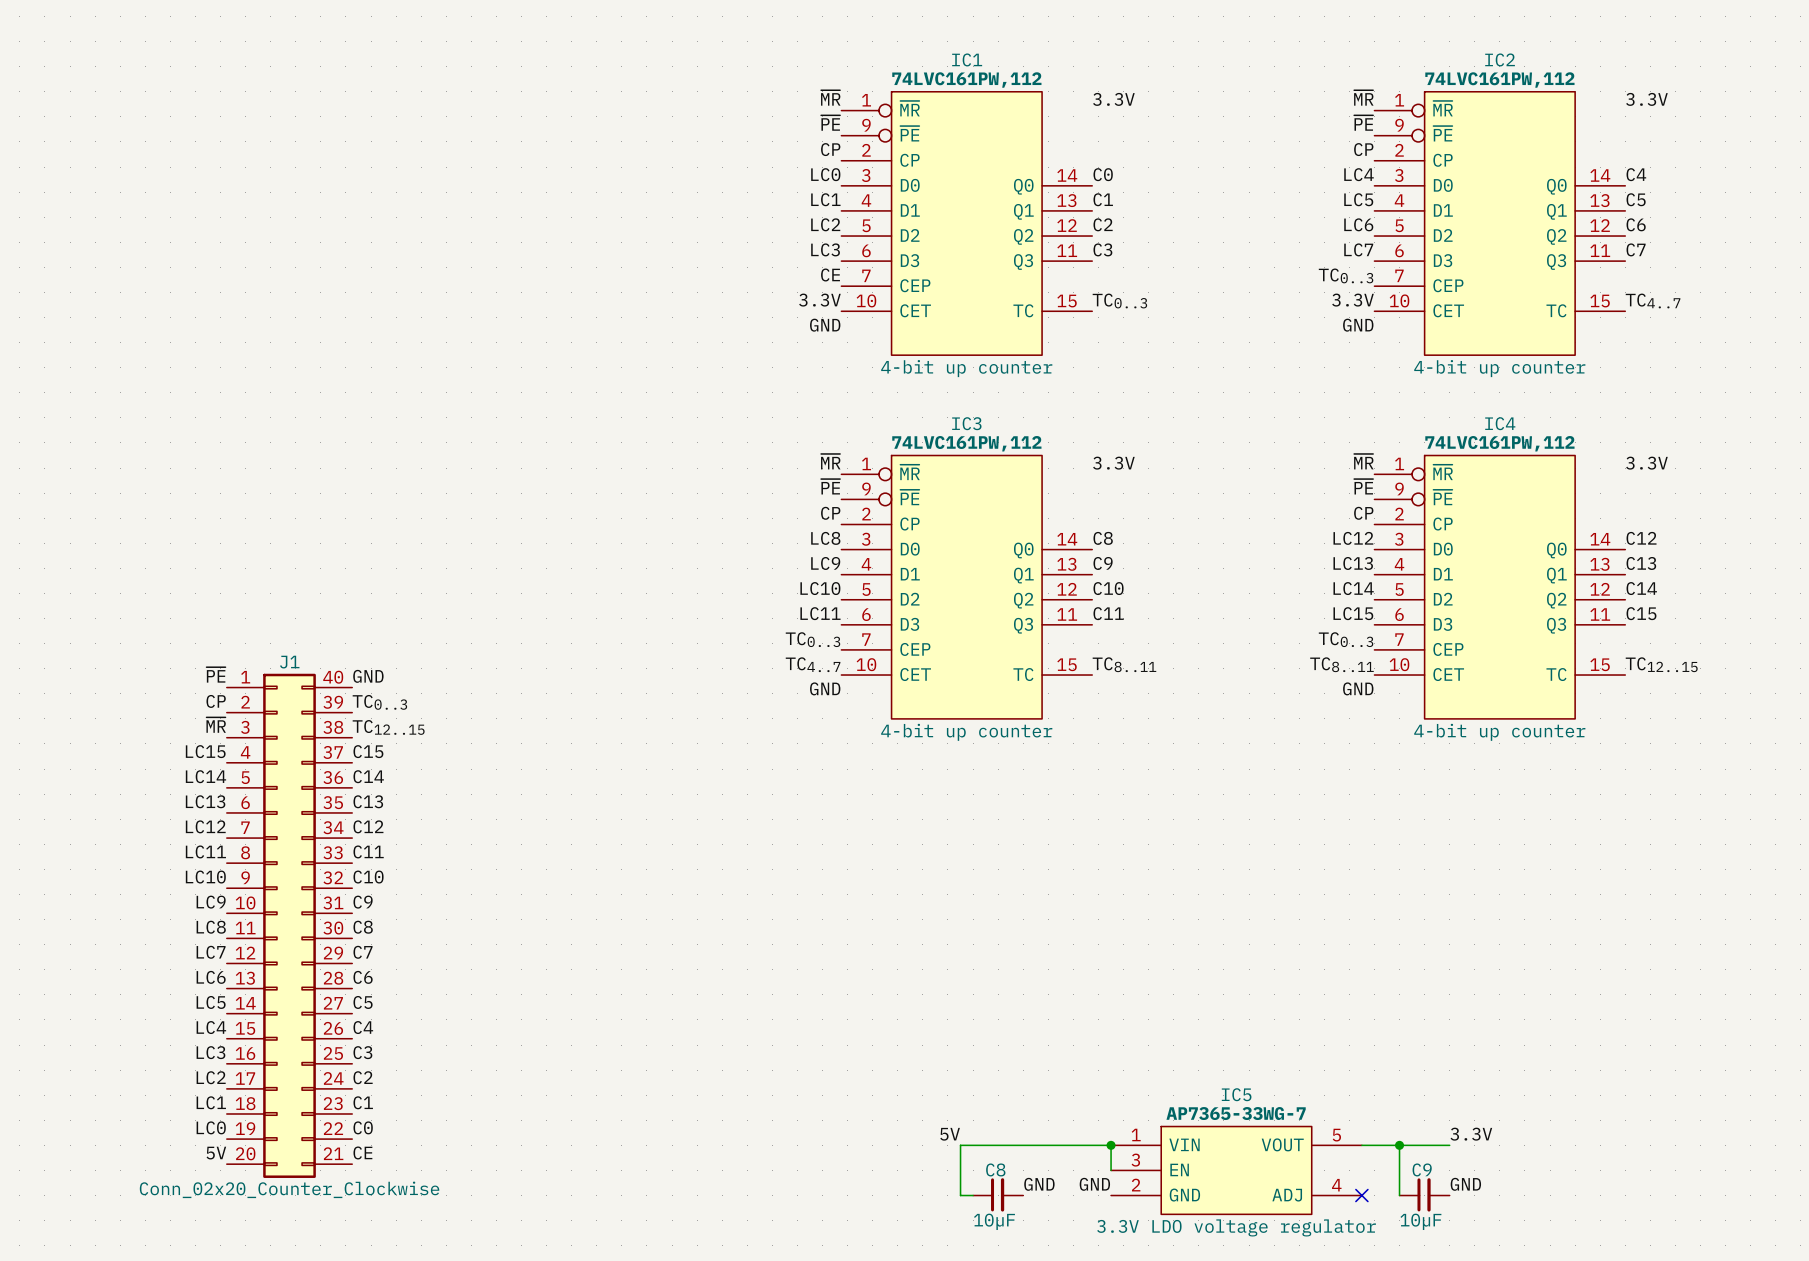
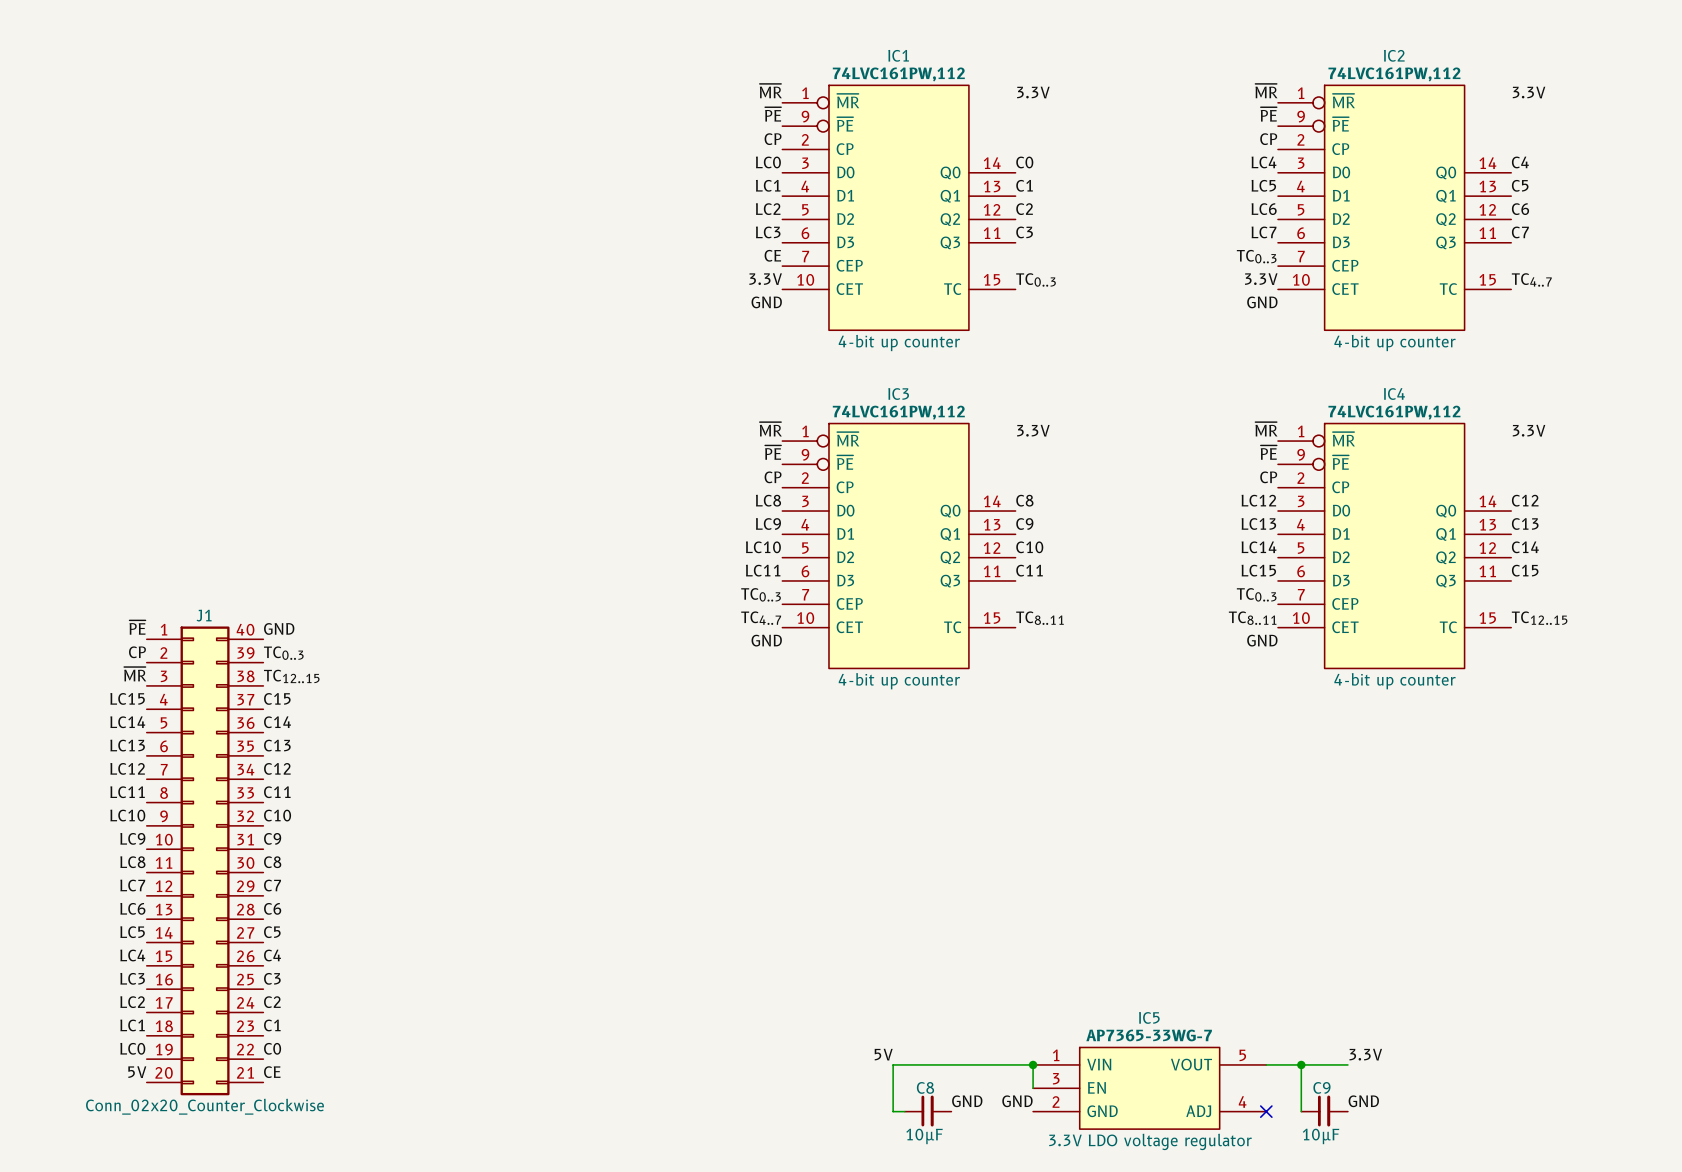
label position: ~{PE} (216, 674) -> ~{PE} (137, 627)
label position: GND (368, 676) -> GND (279, 628)
label position: CP (216, 701) -> CP (137, 652)
label position: TC0..3 (379, 702) -> TC0..3 (283, 653)
label position: ~{MR} (216, 725) -> ~{MR} (135, 674)
label position: TC12..15 (388, 727) -> TC12..15 (291, 676)
label position: LC15 (205, 751) -> LC15 (127, 698)
label position: C15 (368, 751) -> C15 (277, 698)
label position: LC14 (205, 776) -> LC14 (127, 722)
label position: C14 (368, 776) -> C14 (277, 722)
label position: LC13 (205, 801) -> LC13 (127, 745)
label position: C13 (368, 801) -> C13 (277, 745)
label position: LC12 (205, 826) -> LC12 (127, 768)
label position: C12 (368, 826) -> C12 (277, 768)
label position: LC11 (205, 851) -> LC11 (127, 792)
label position: C11 (368, 851) -> C11 (277, 792)
label position: LC10 (205, 877) -> LC10 (127, 815)
label position: C10 (368, 877) -> C10 (277, 815)
label position: LC9 (211, 902) -> LC9 (132, 838)
label position: C9 (363, 902) -> C9 (272, 838)
J1 position: (289, 925) -> (205, 860)
label position: LC8 (211, 927) -> LC8 (132, 862)
label position: C8 (363, 927) -> C8 (272, 862)
label position: LC7 (211, 952) -> LC7 (132, 885)
label position: C7 (363, 952) -> C7 (272, 885)
label position: LC6 (211, 977) -> LC6 (132, 908)
label position: C6 (363, 977) -> C6 (272, 908)
label position: LC5 (211, 1002) -> LC5 (132, 932)
label position: C5 (363, 1002) -> C5 (272, 932)
label position: LC4 (211, 1027) -> LC4 (132, 955)
label position: C4 (363, 1027) -> C4 (272, 955)
label position: LC3 (210, 1052) -> LC3 (132, 978)
label position: C3 (362, 1052) -> C3 (272, 978)
label position: LC2 (211, 1077) -> LC2 (132, 1002)
label position: C2 (363, 1077) -> C2 (272, 1002)
label position: LC1 (211, 1102) -> LC1 (132, 1025)
label position: C1 (363, 1102) -> C1 (272, 1025)
label position: LC0 (211, 1127) -> LC0 (132, 1048)
label position: C0 (363, 1127) -> C0 (272, 1048)
label position: CE (362, 1152) -> CE (272, 1072)
label position: 5V (216, 1153) -> 5V (137, 1072)

